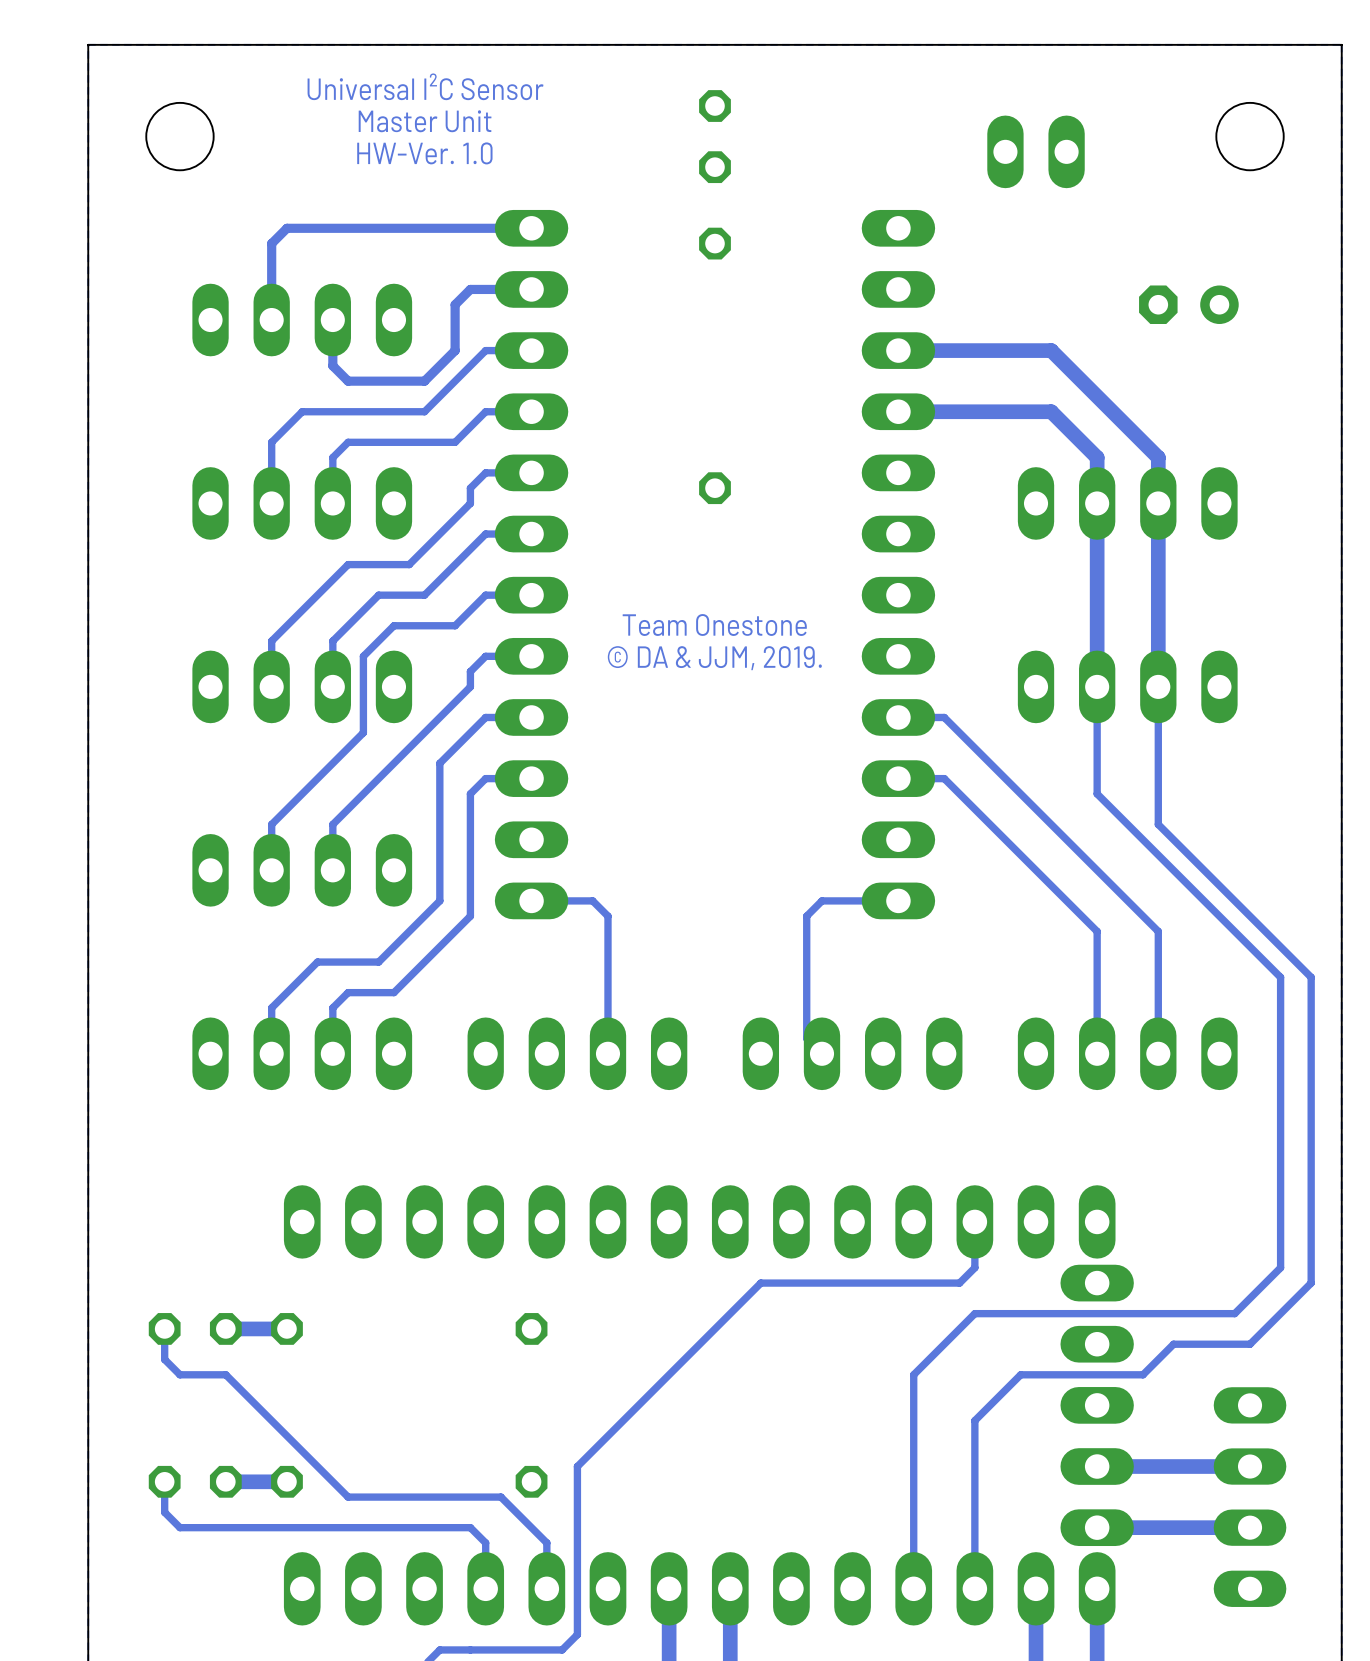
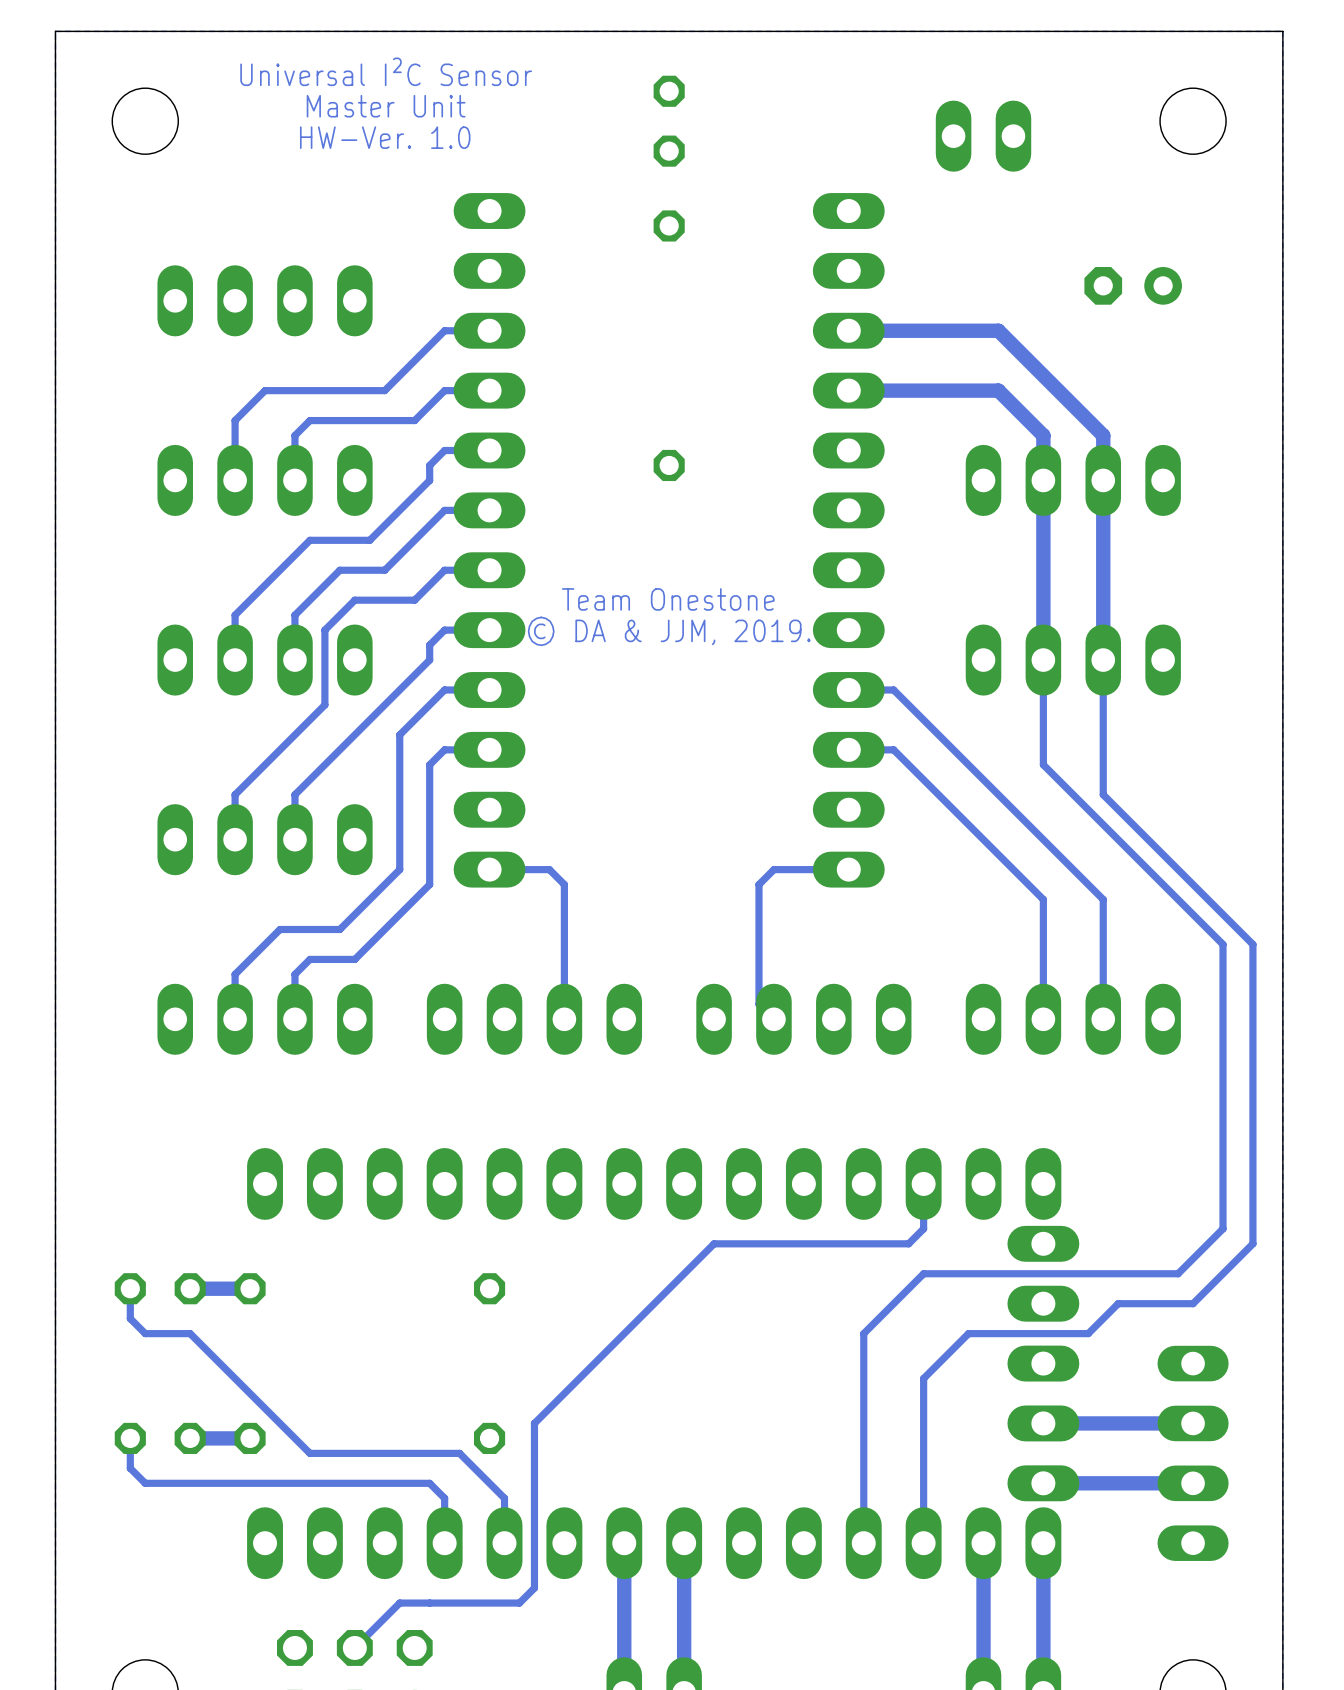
track: (531, 228) (286, 228) (271, 243) (271, 320) -> none
track: (531, 289) (470, 289) (455, 304) (455, 350) (424, 381) (348, 381) (332, 365) (332, 320) -> none

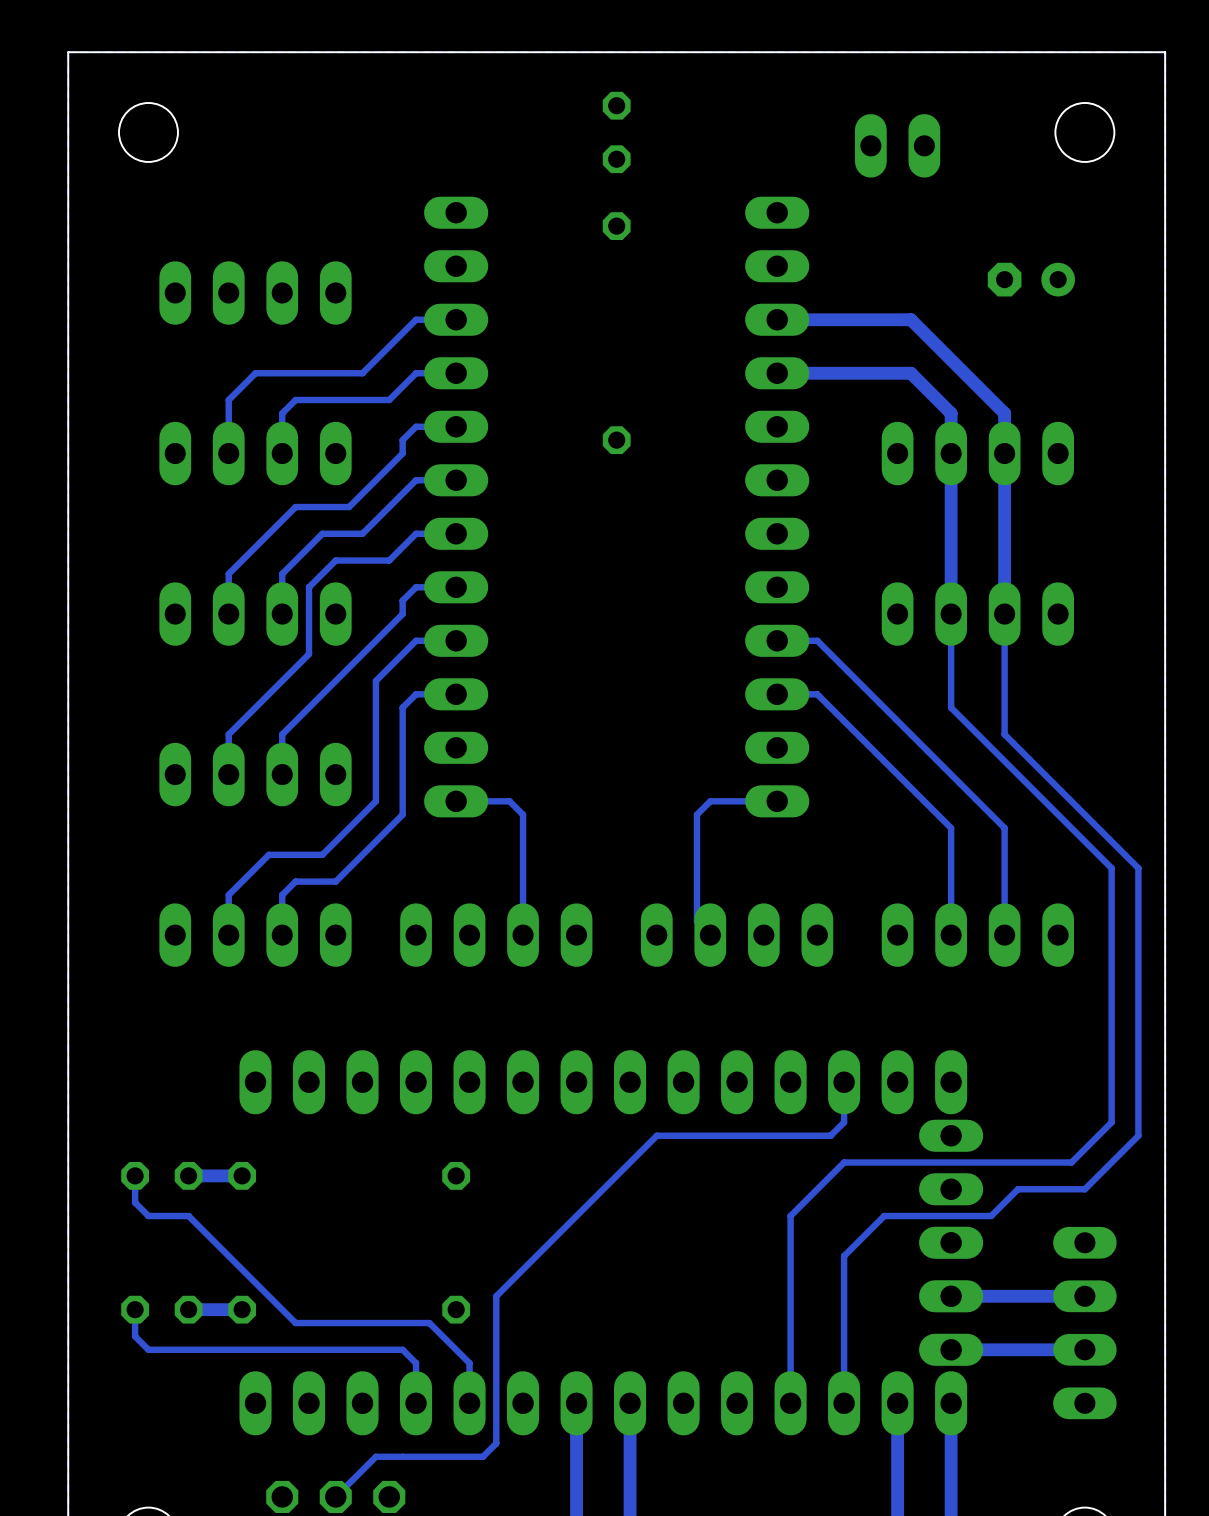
text: Universal I²C Sensor (386, 71) -> none
text: Master Unit (386, 106) -> none
text: HW-Ver. 1.0 (385, 137) -> none
text: Team Onestone (668, 599) -> none
text: © DA & JJM, 2019. (669, 631) -> none

